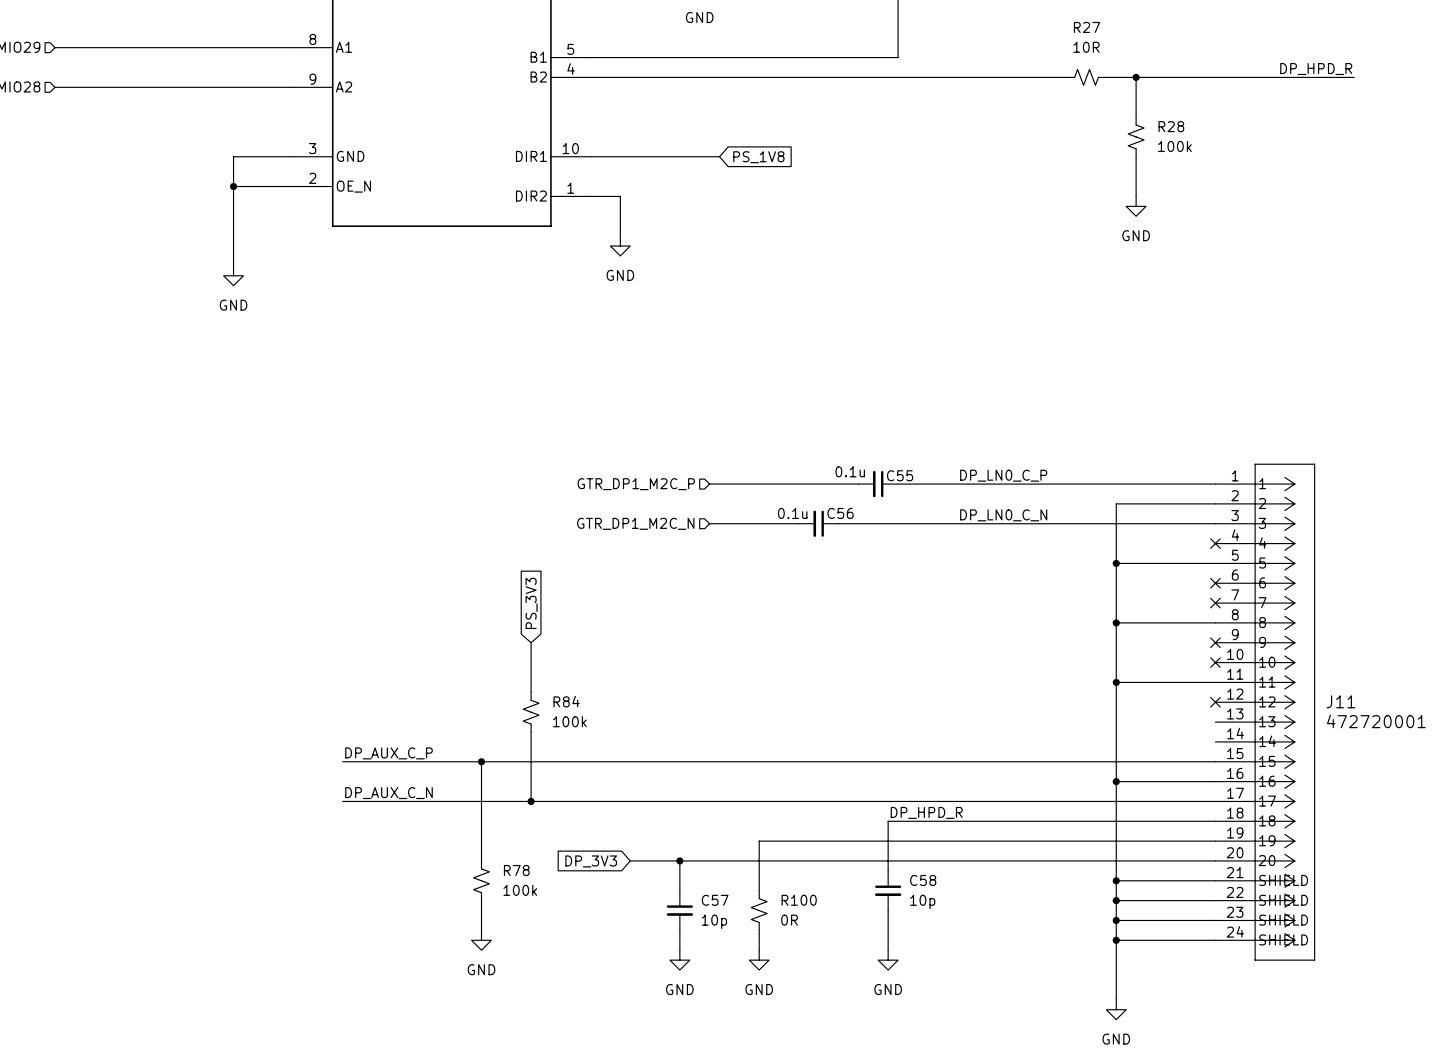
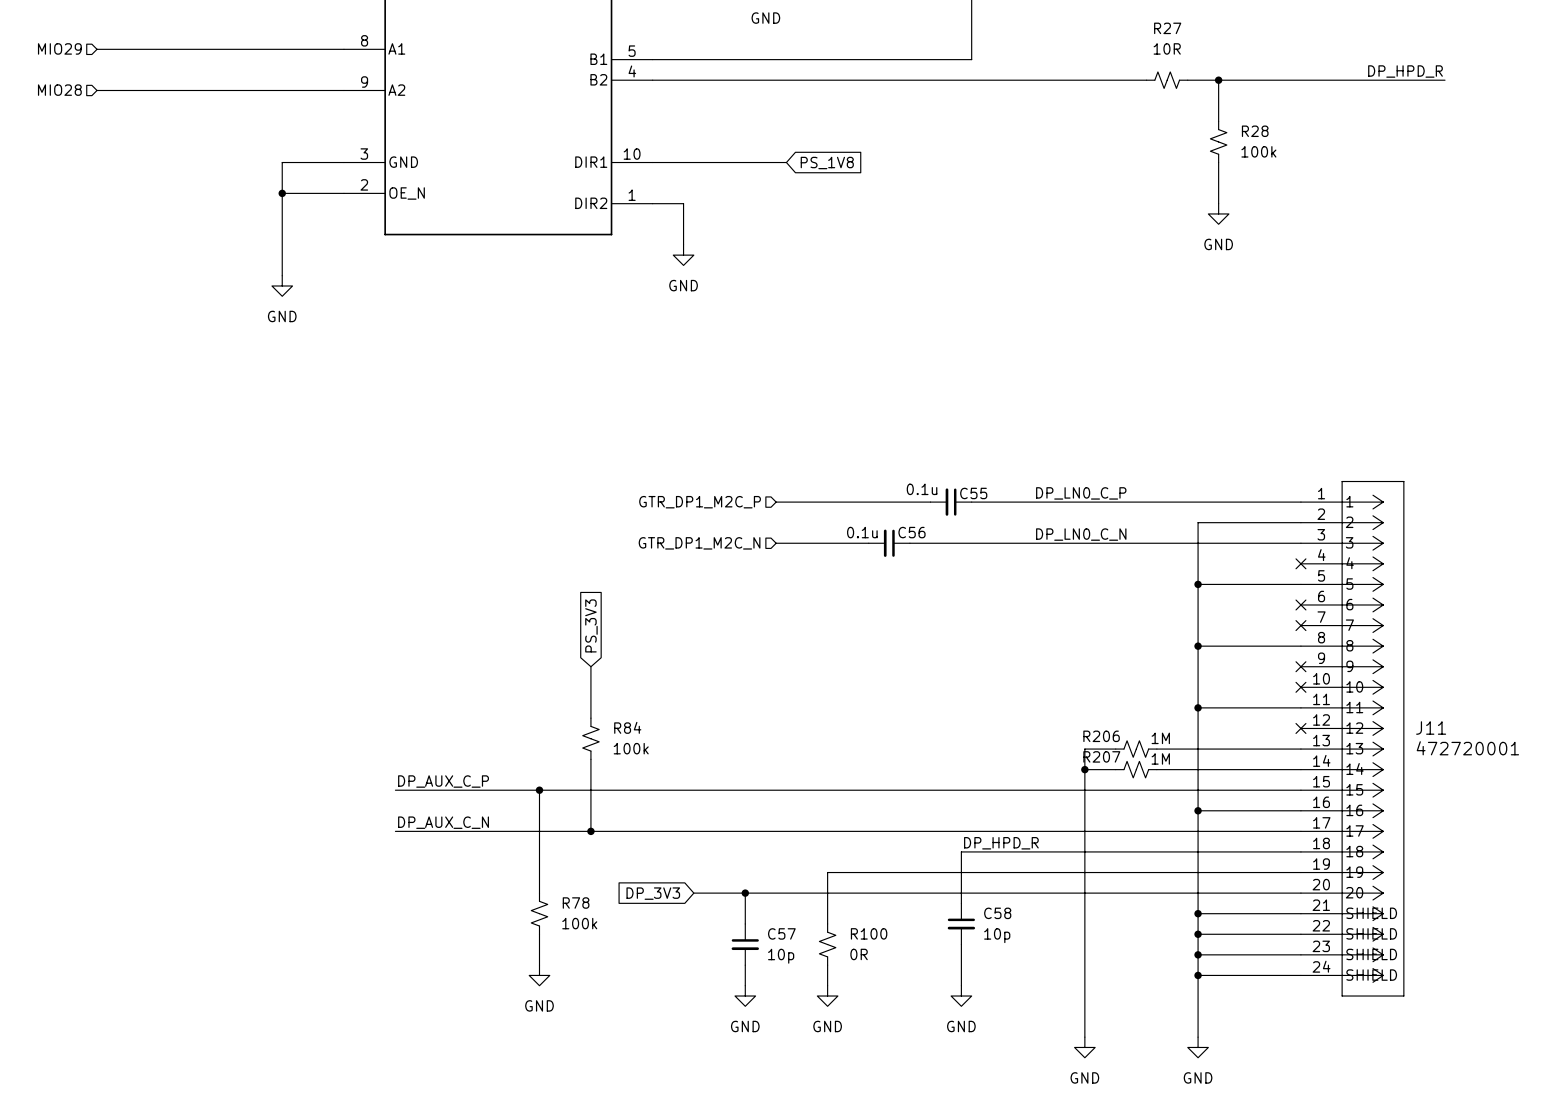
wire: none -> (1115, 749) (1084, 749) (1084, 1037)
R206: none -> 1M (1136, 749)
wire: none -> (1156, 749) (1300, 749)
wire: none -> (1084, 769) (1115, 769)
junction: none -> (1084, 769)
R207: none -> 1M (1136, 769)
wire: none -> (1156, 769) (1300, 769)
power symbol: none -> GND (1084, 1047)

